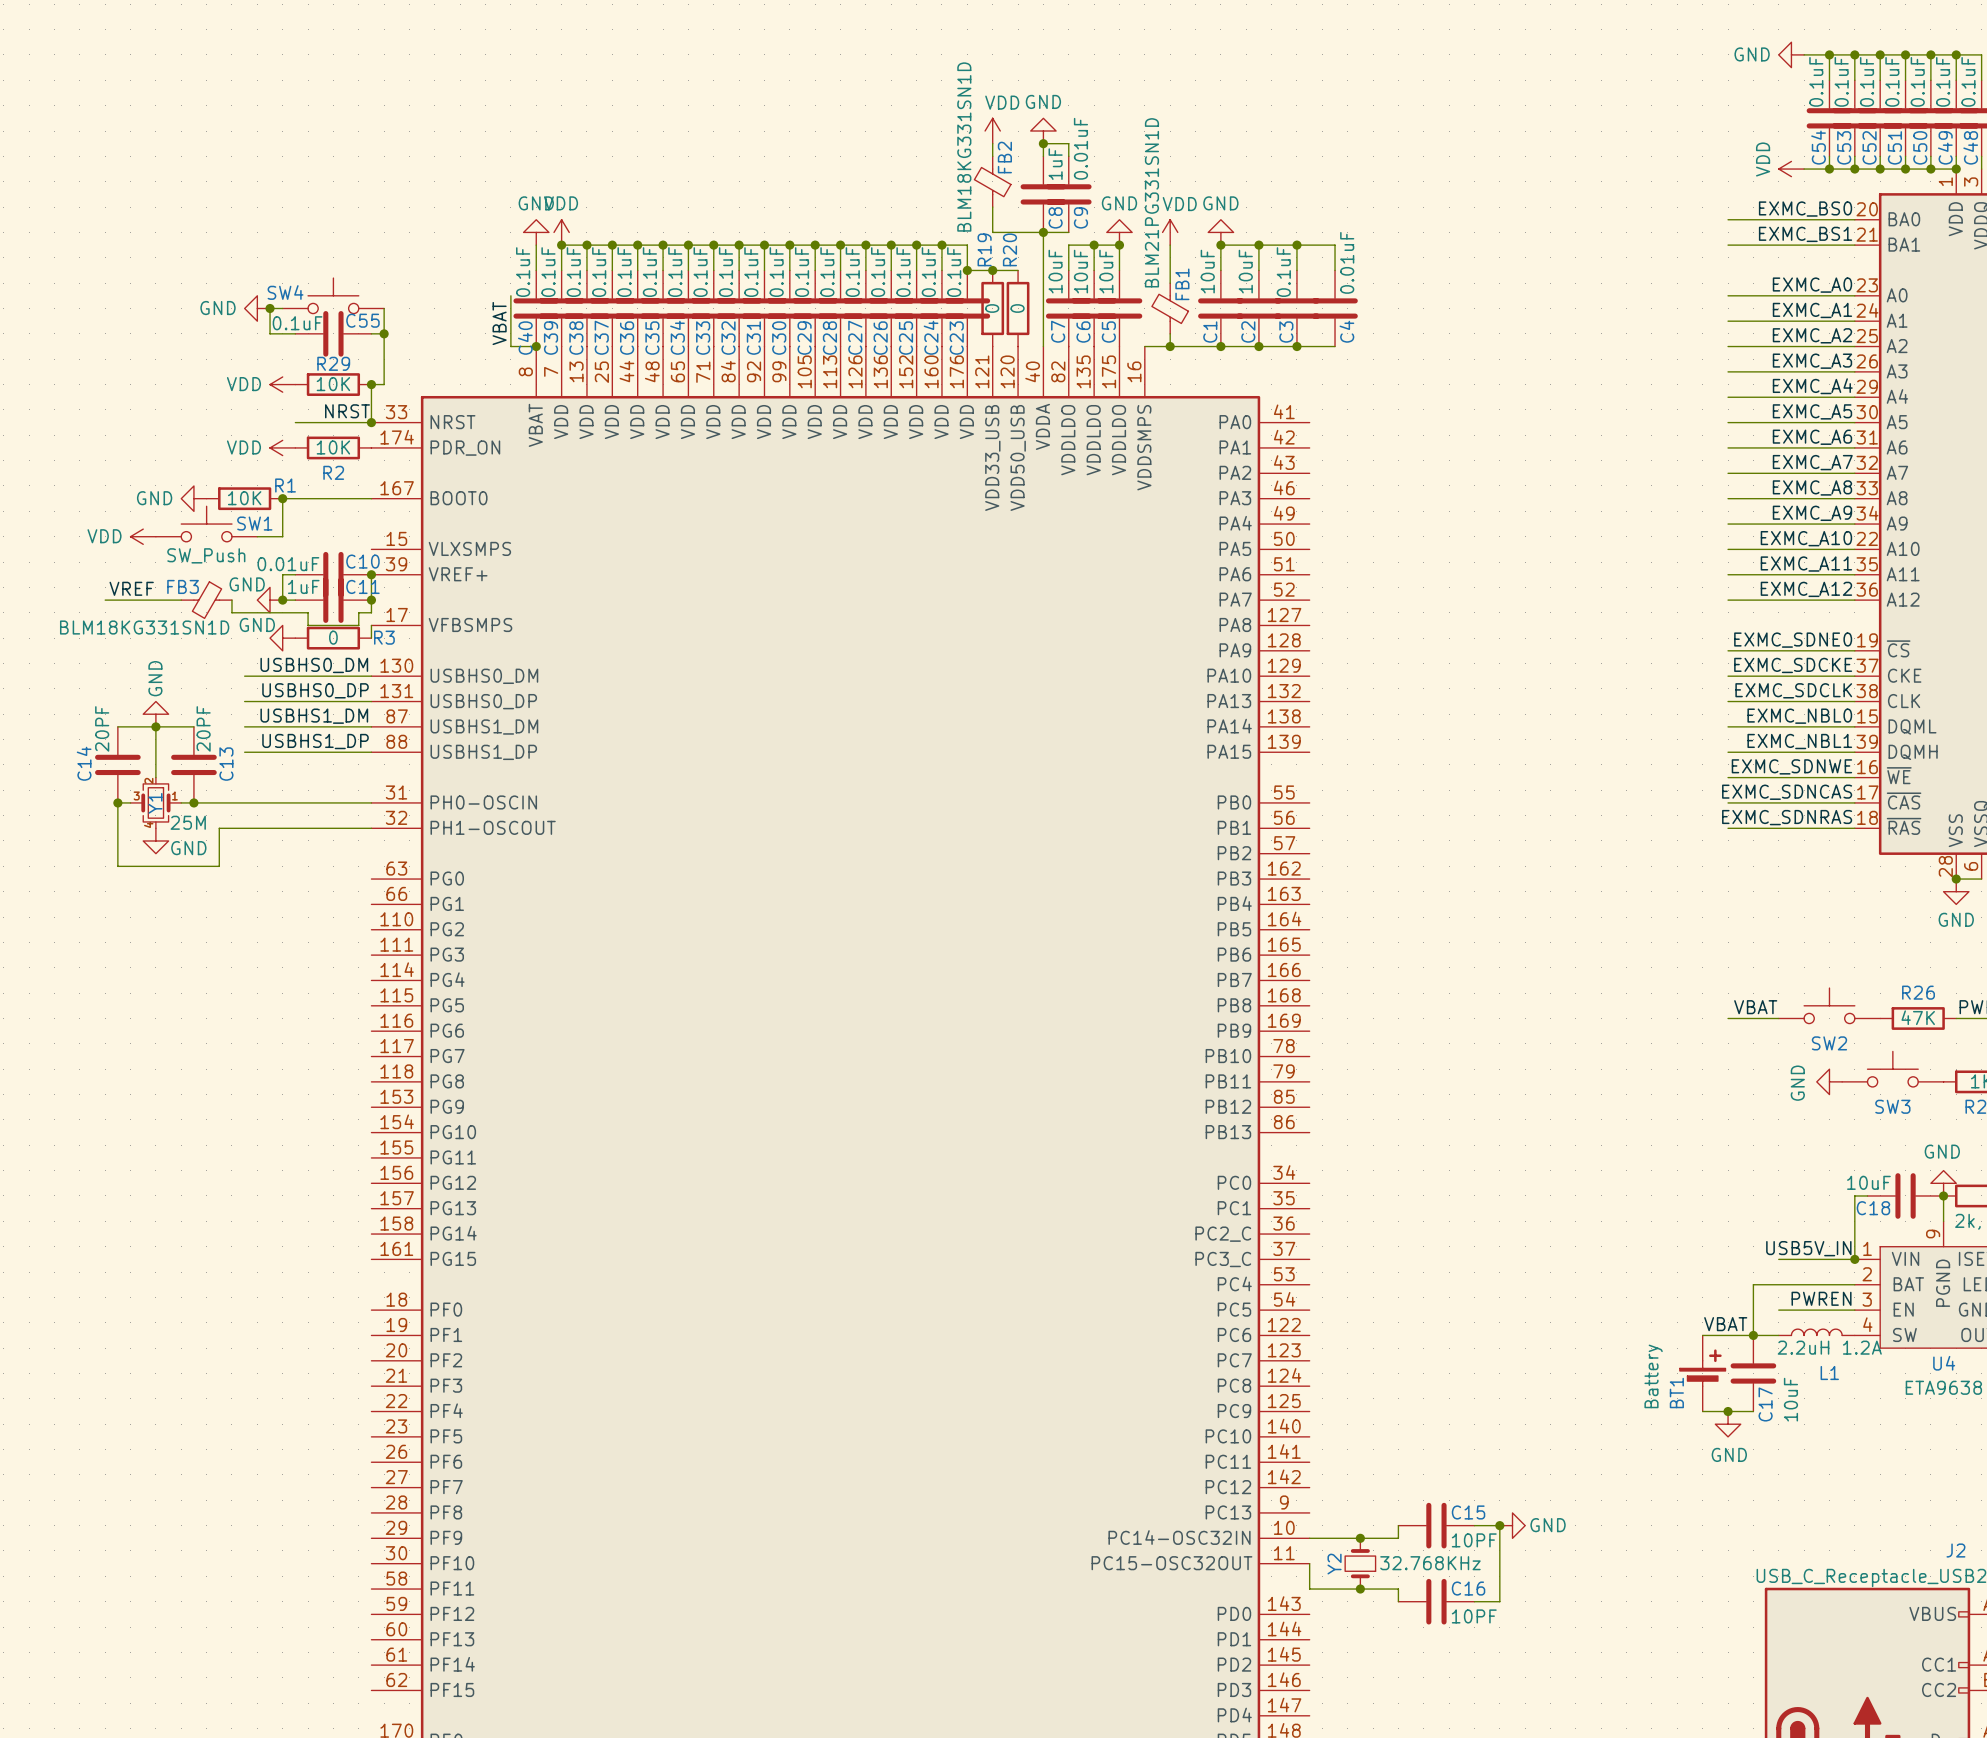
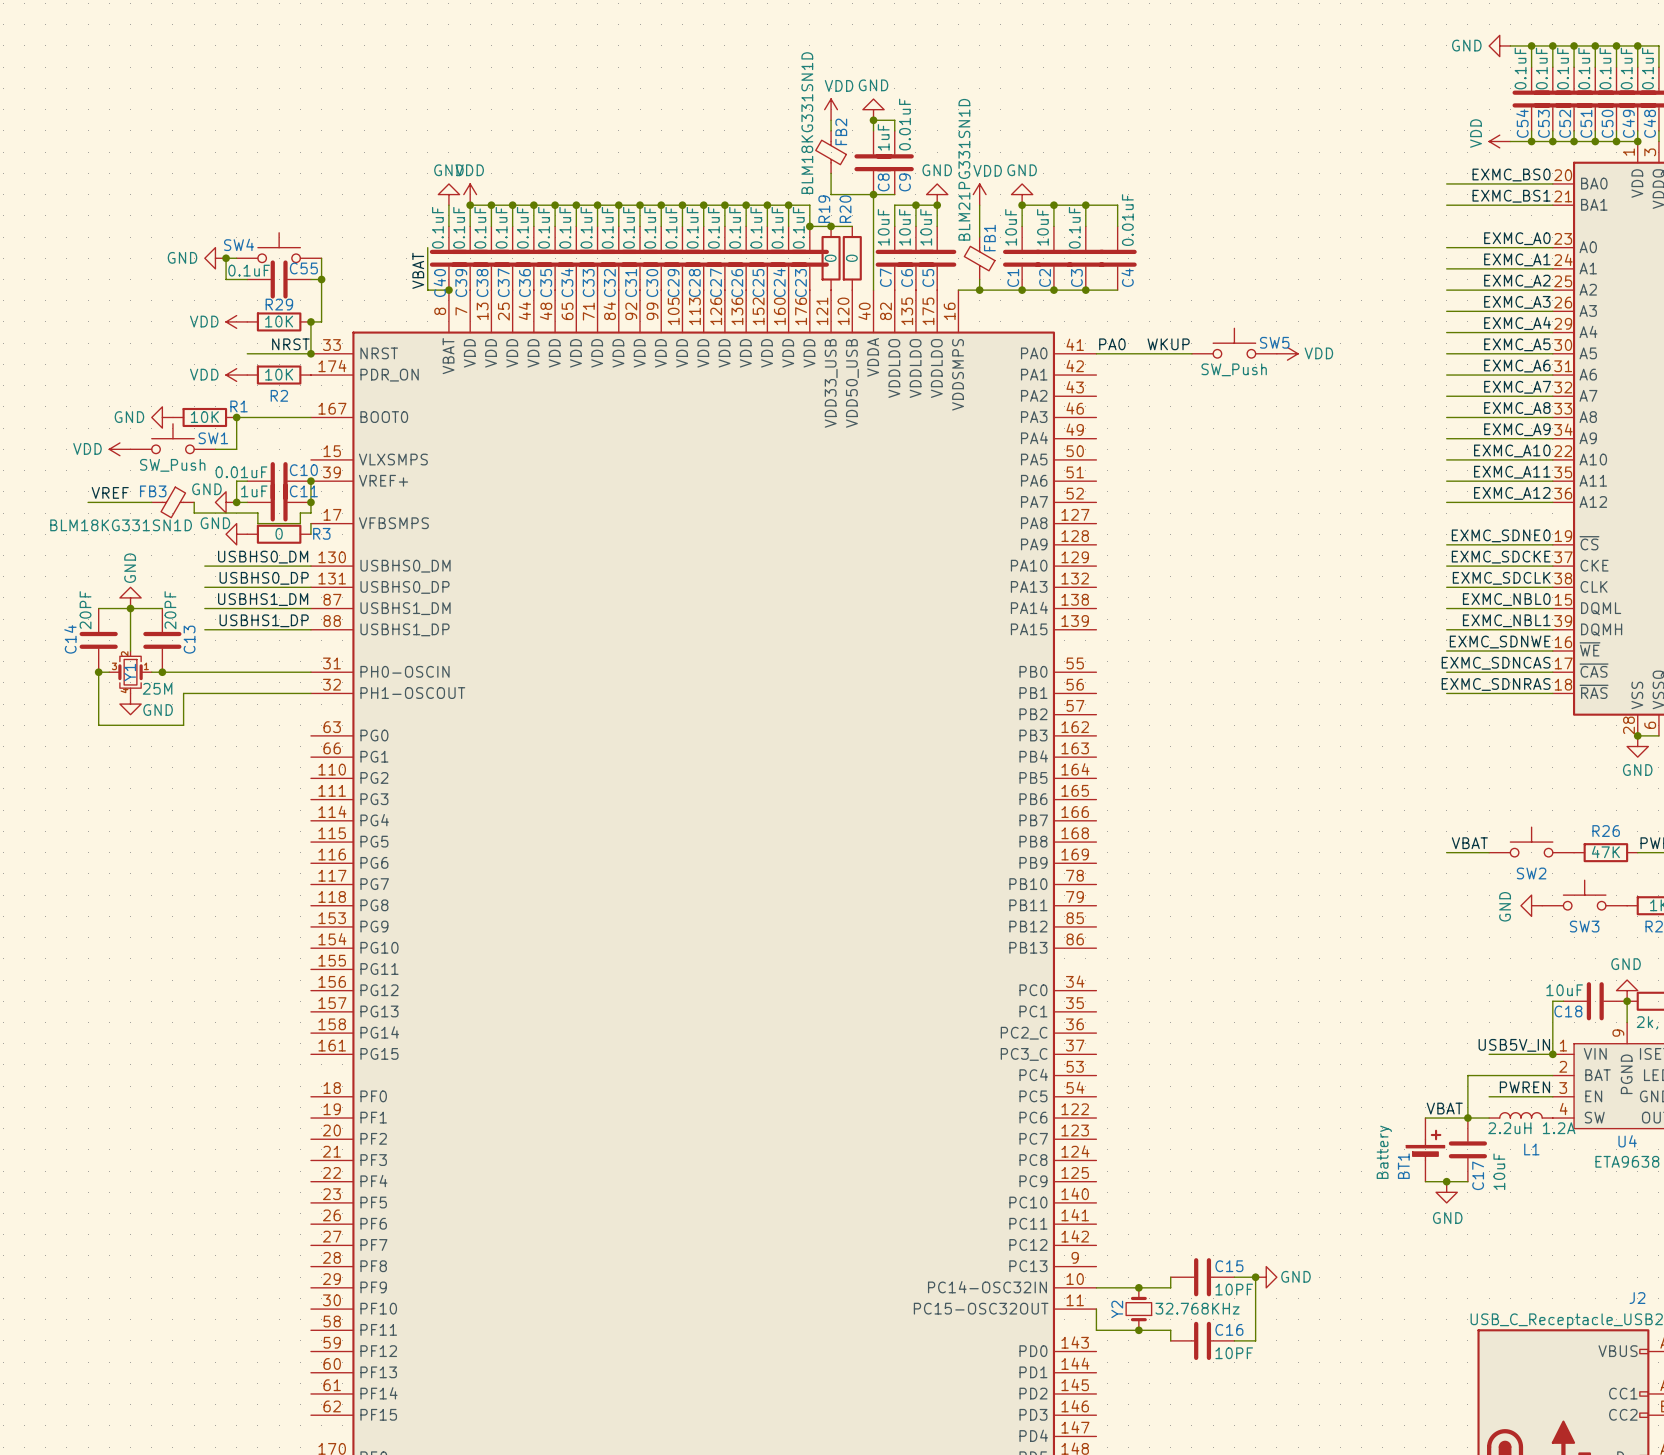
SW5: none -> SW_Push (1234, 343)
label: none -> PA0 (1112, 344)
label: none -> WKUP (1168, 344)
wire: none -> (1096, 353) (1191, 353)
power symbol: none -> VDD (1287, 353)

